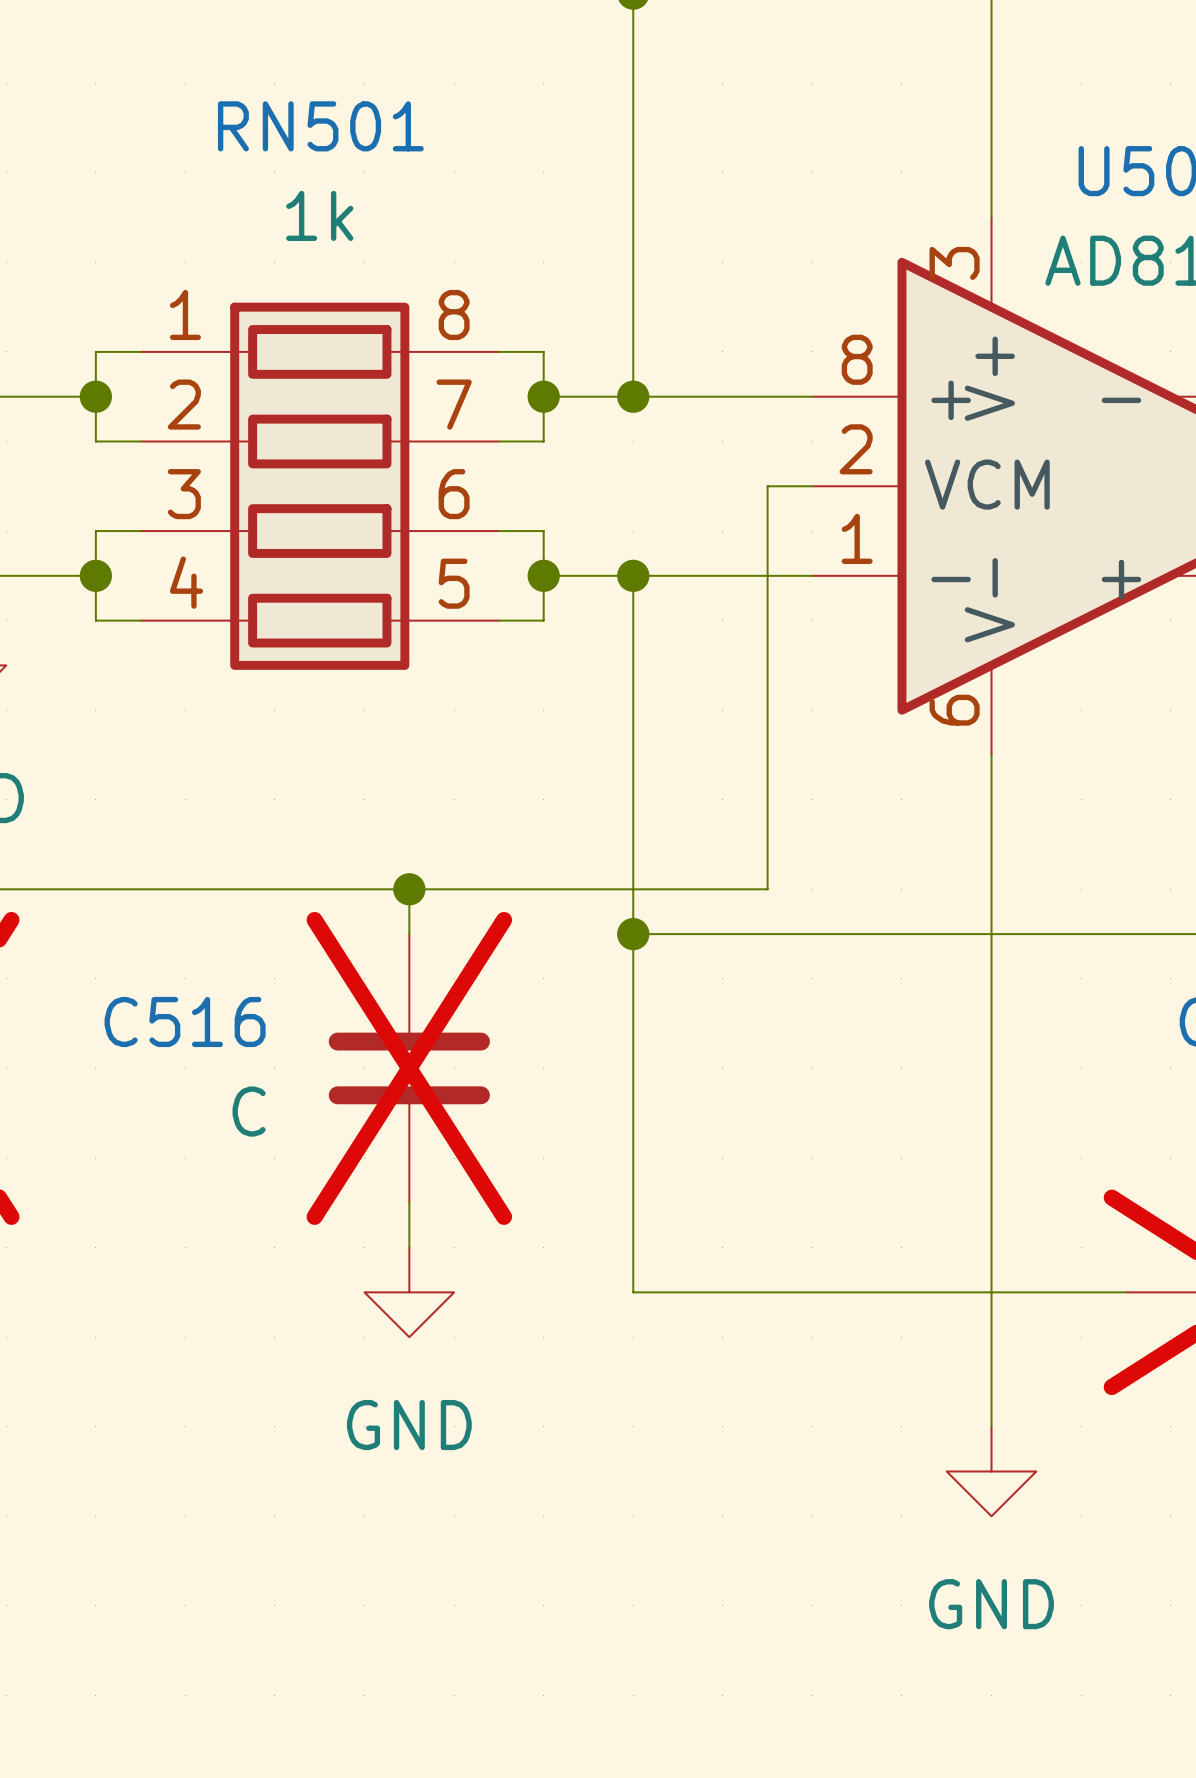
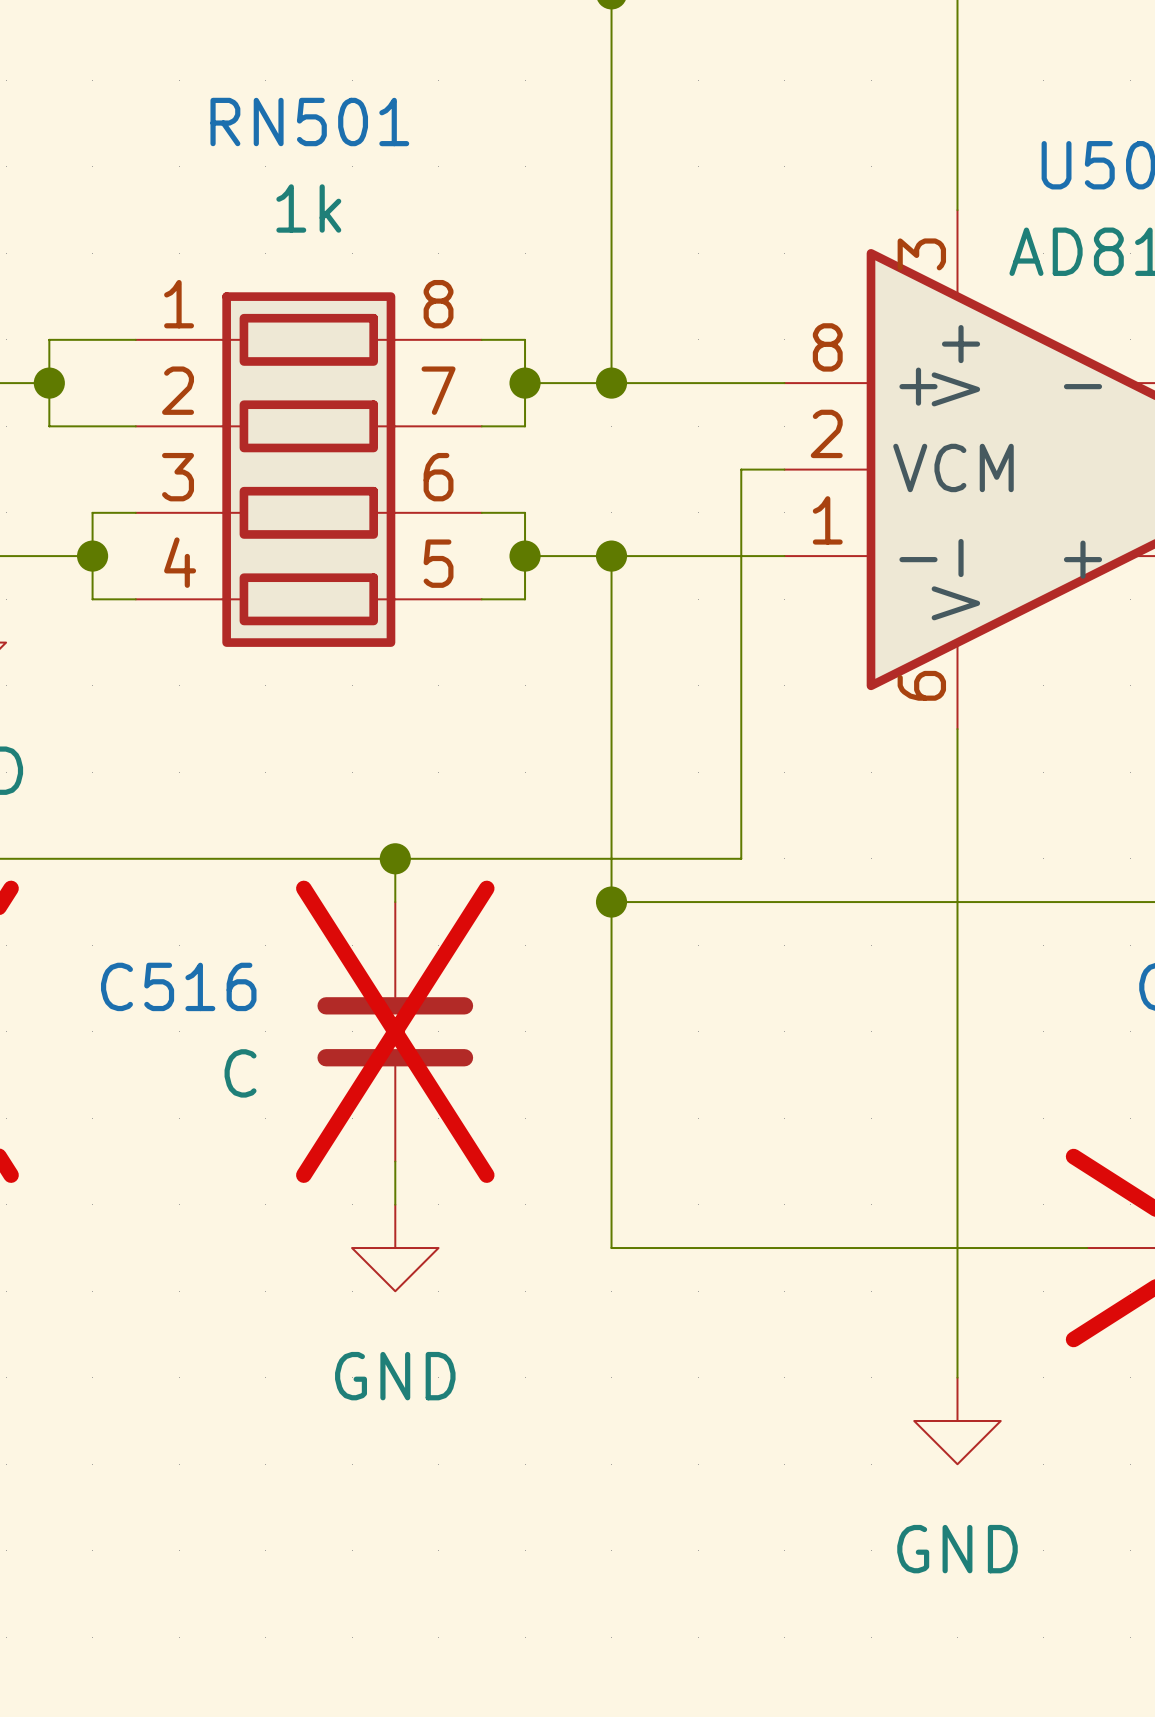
wire: (95, 351) (95, 441) -> (92, 339) (49, 339) (49, 426) (92, 426)
wire: (51, 396) (95, 396) -> none
junction position: (95, 396) -> (49, 383)

